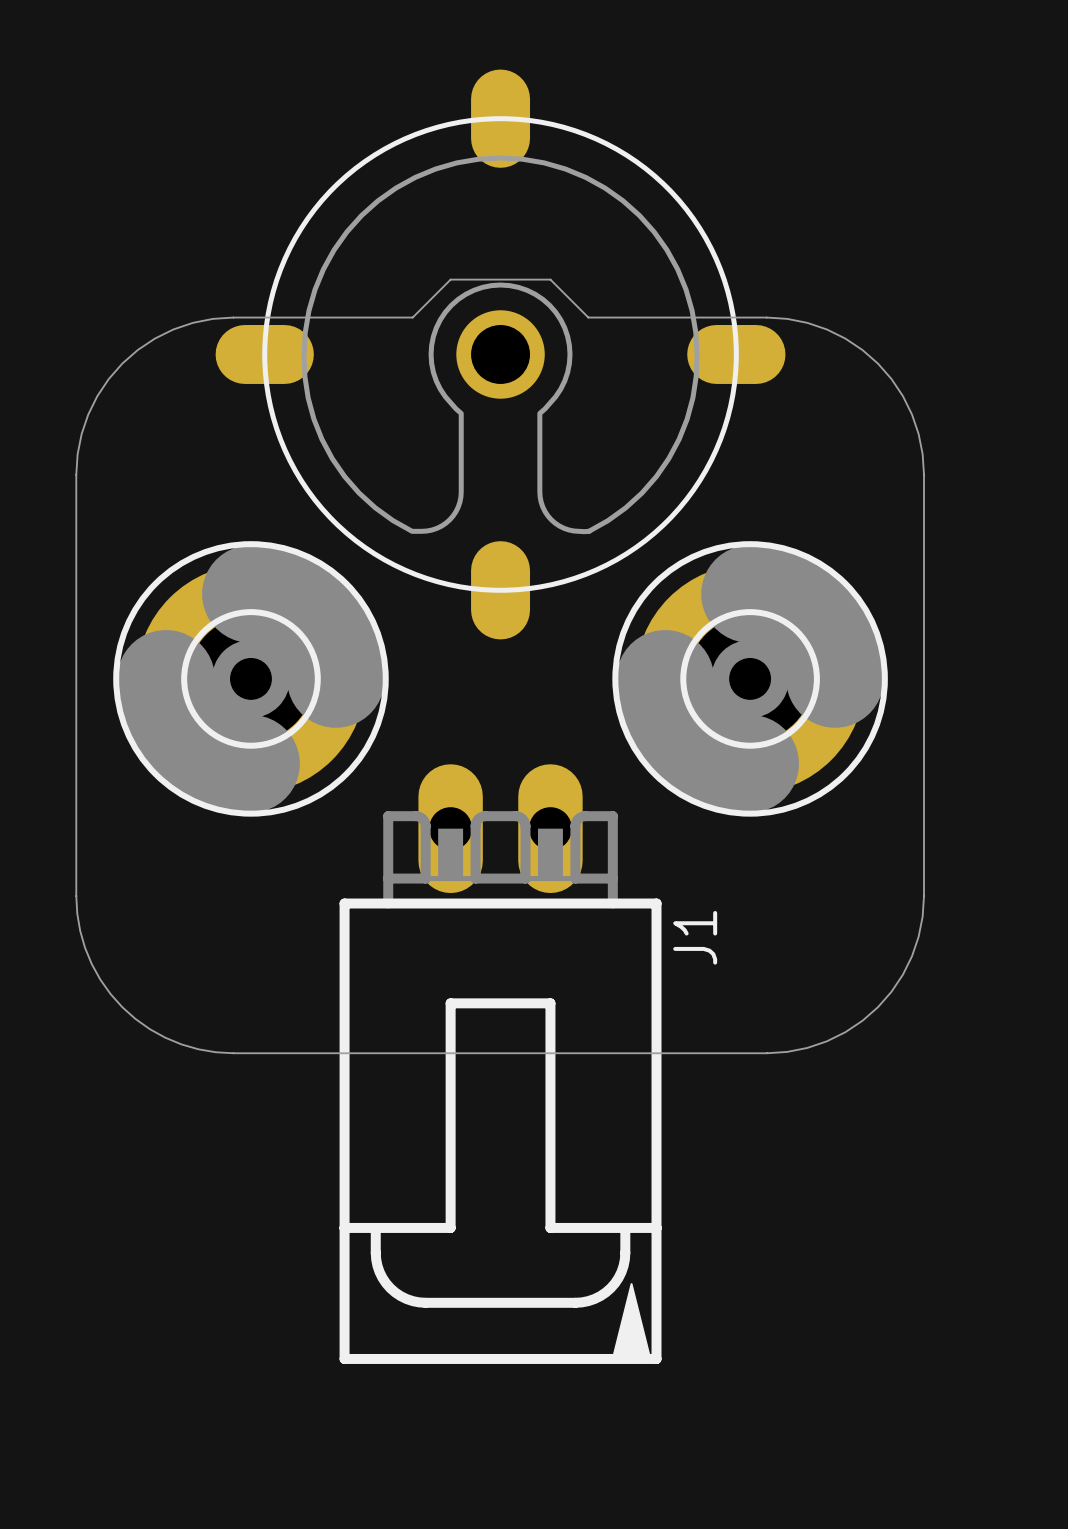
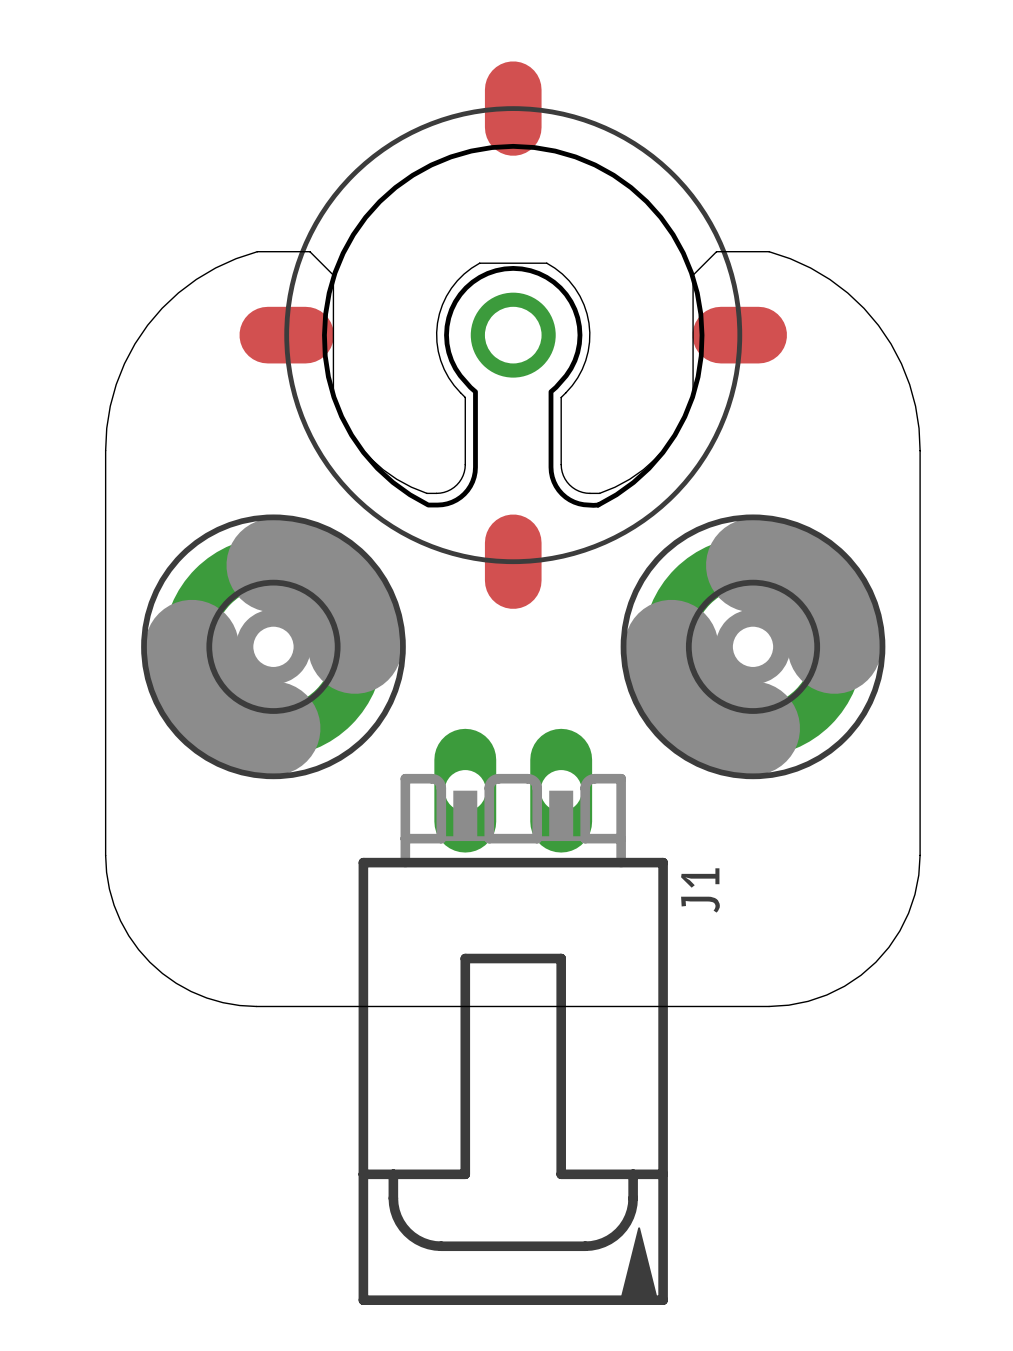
board edge: (465, 279) (450, 279) (412, 317) (212, 318) (192, 322) (154, 338) (122, 363) (97, 396) (81, 434) (76, 474) -> (479, 263) (464, 274) (451, 288) (442, 304) (437, 323) (436, 342) (440, 360) (448, 377) (465, 397) (465, 468) (461, 478) (450, 489) (440, 493) (426, 493) (396, 479) (370, 458) (349, 432) (333, 395) (333, 275) (309, 251) (257, 251) (236, 258) (196, 279) (162, 308) (135, 343) (116, 384) (110, 406) (105, 450)
board edge: (535, 279) (550, 279) (588, 317) (787, 318) (807, 322) (845, 338) (877, 363) (902, 396) (918, 434) (924, 474) -> (546, 263) (562, 274) (575, 288) (584, 304) (588, 323) (589, 342) (585, 360) (577, 377) (561, 397) (561, 468) (565, 478) (575, 489) (586, 493) (599, 493) (629, 479) (655, 458) (676, 432) (693, 395) (693, 275) (716, 251) (769, 251) (790, 258) (829, 279) (864, 308) (878, 325) (901, 363) (915, 406) (920, 450)

